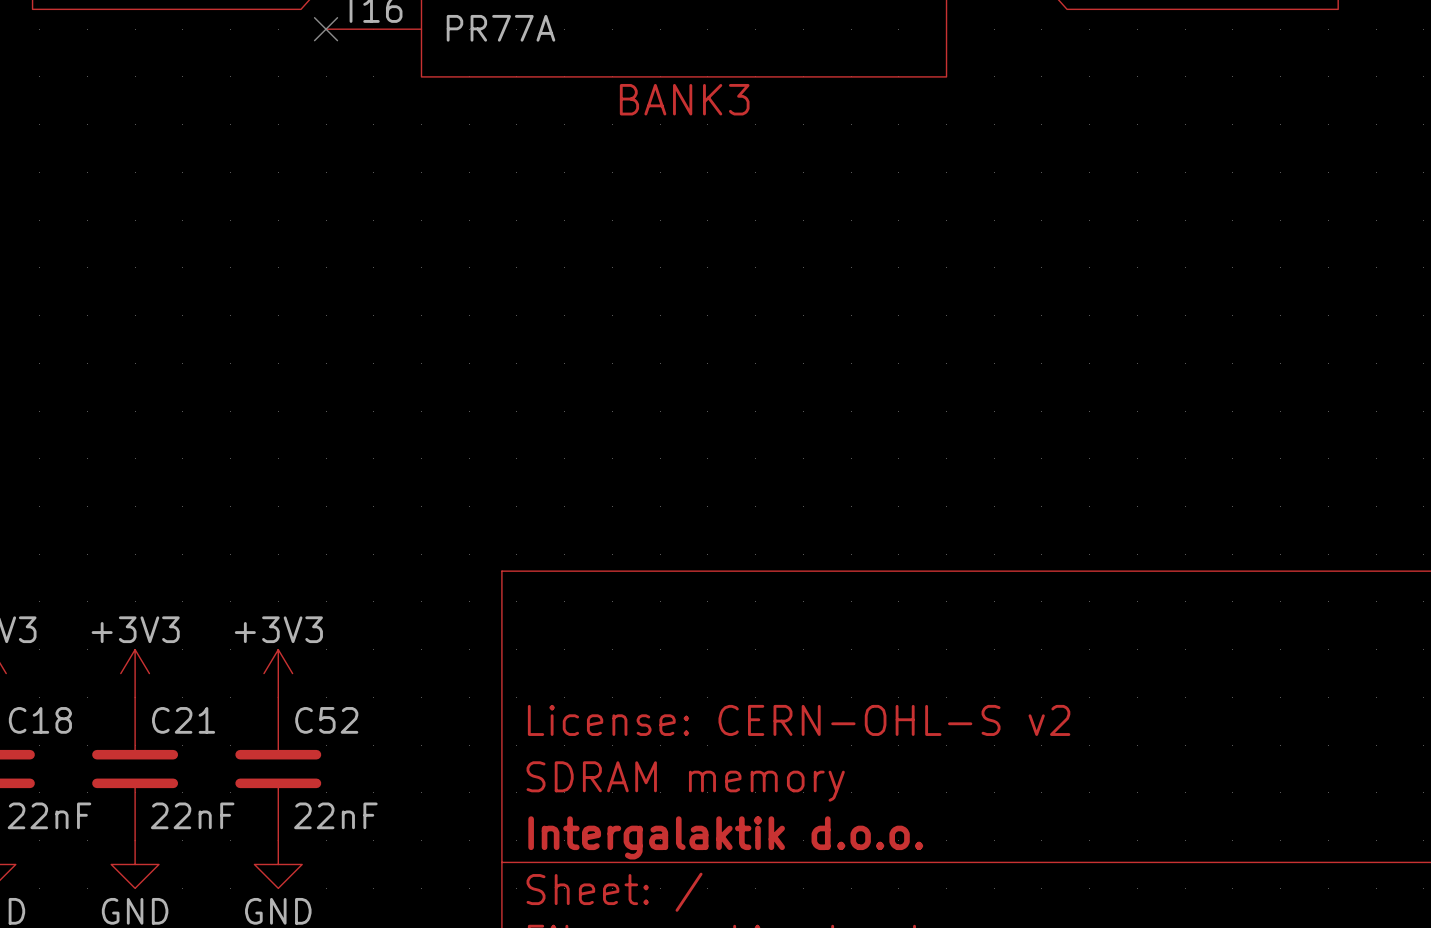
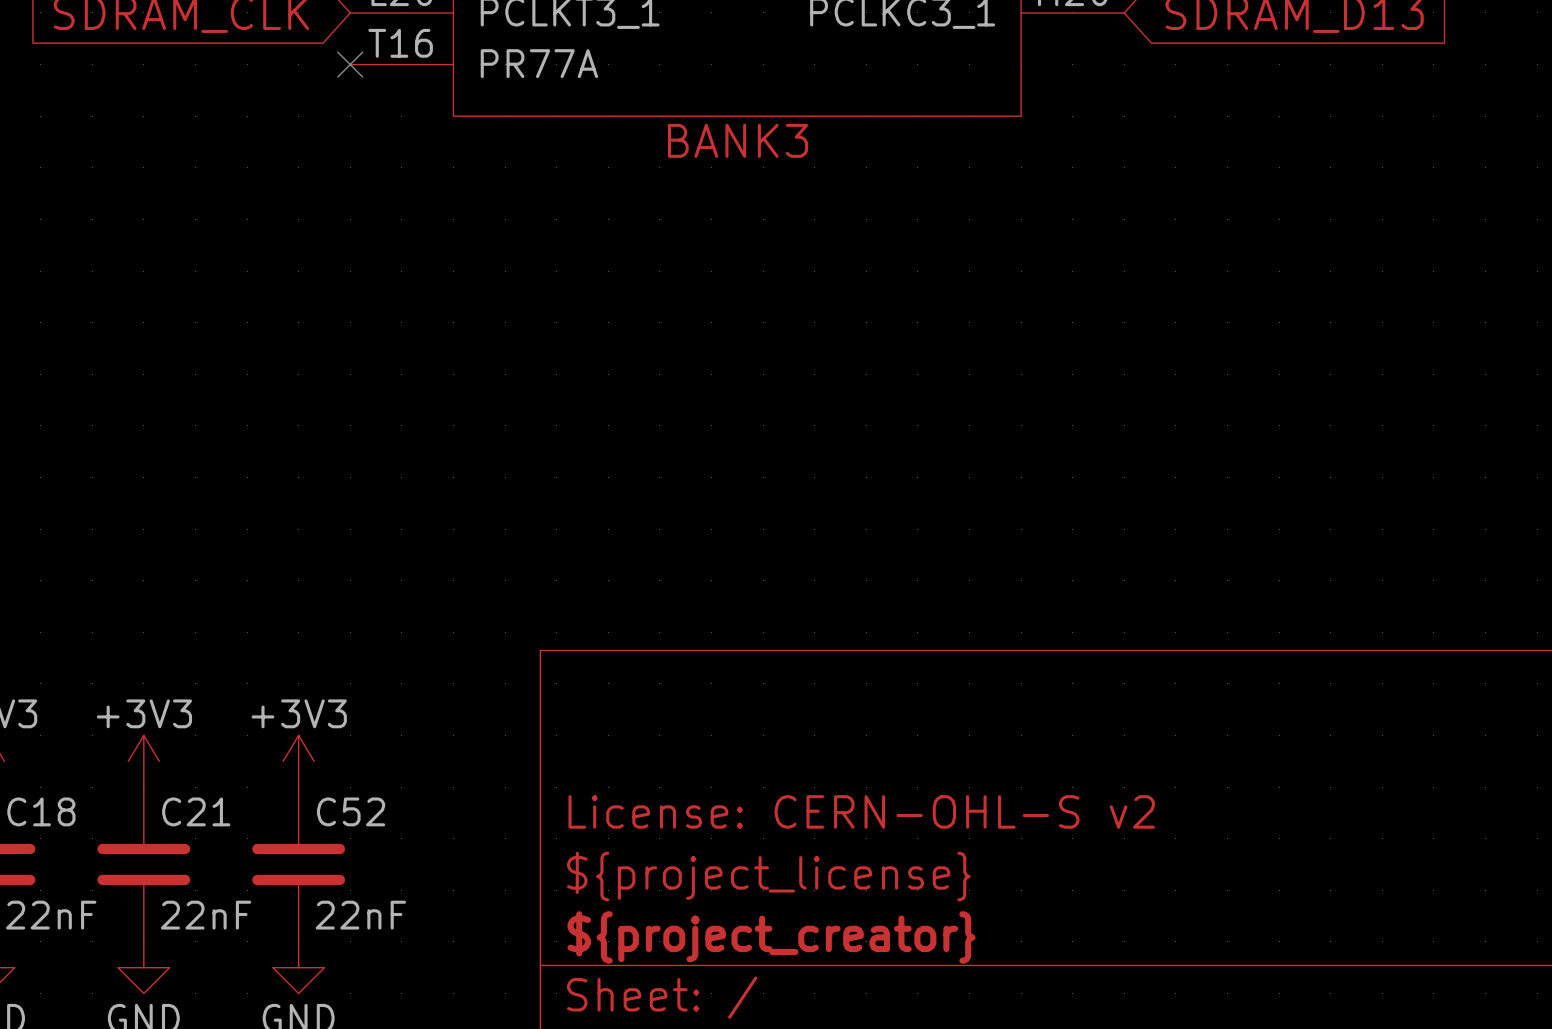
title block: SDRAM memory (685, 781) -> ${project_license} (768, 876)
title block: Intergalaktik d.o.o. (725, 837) -> ${project_creator} (771, 937)

